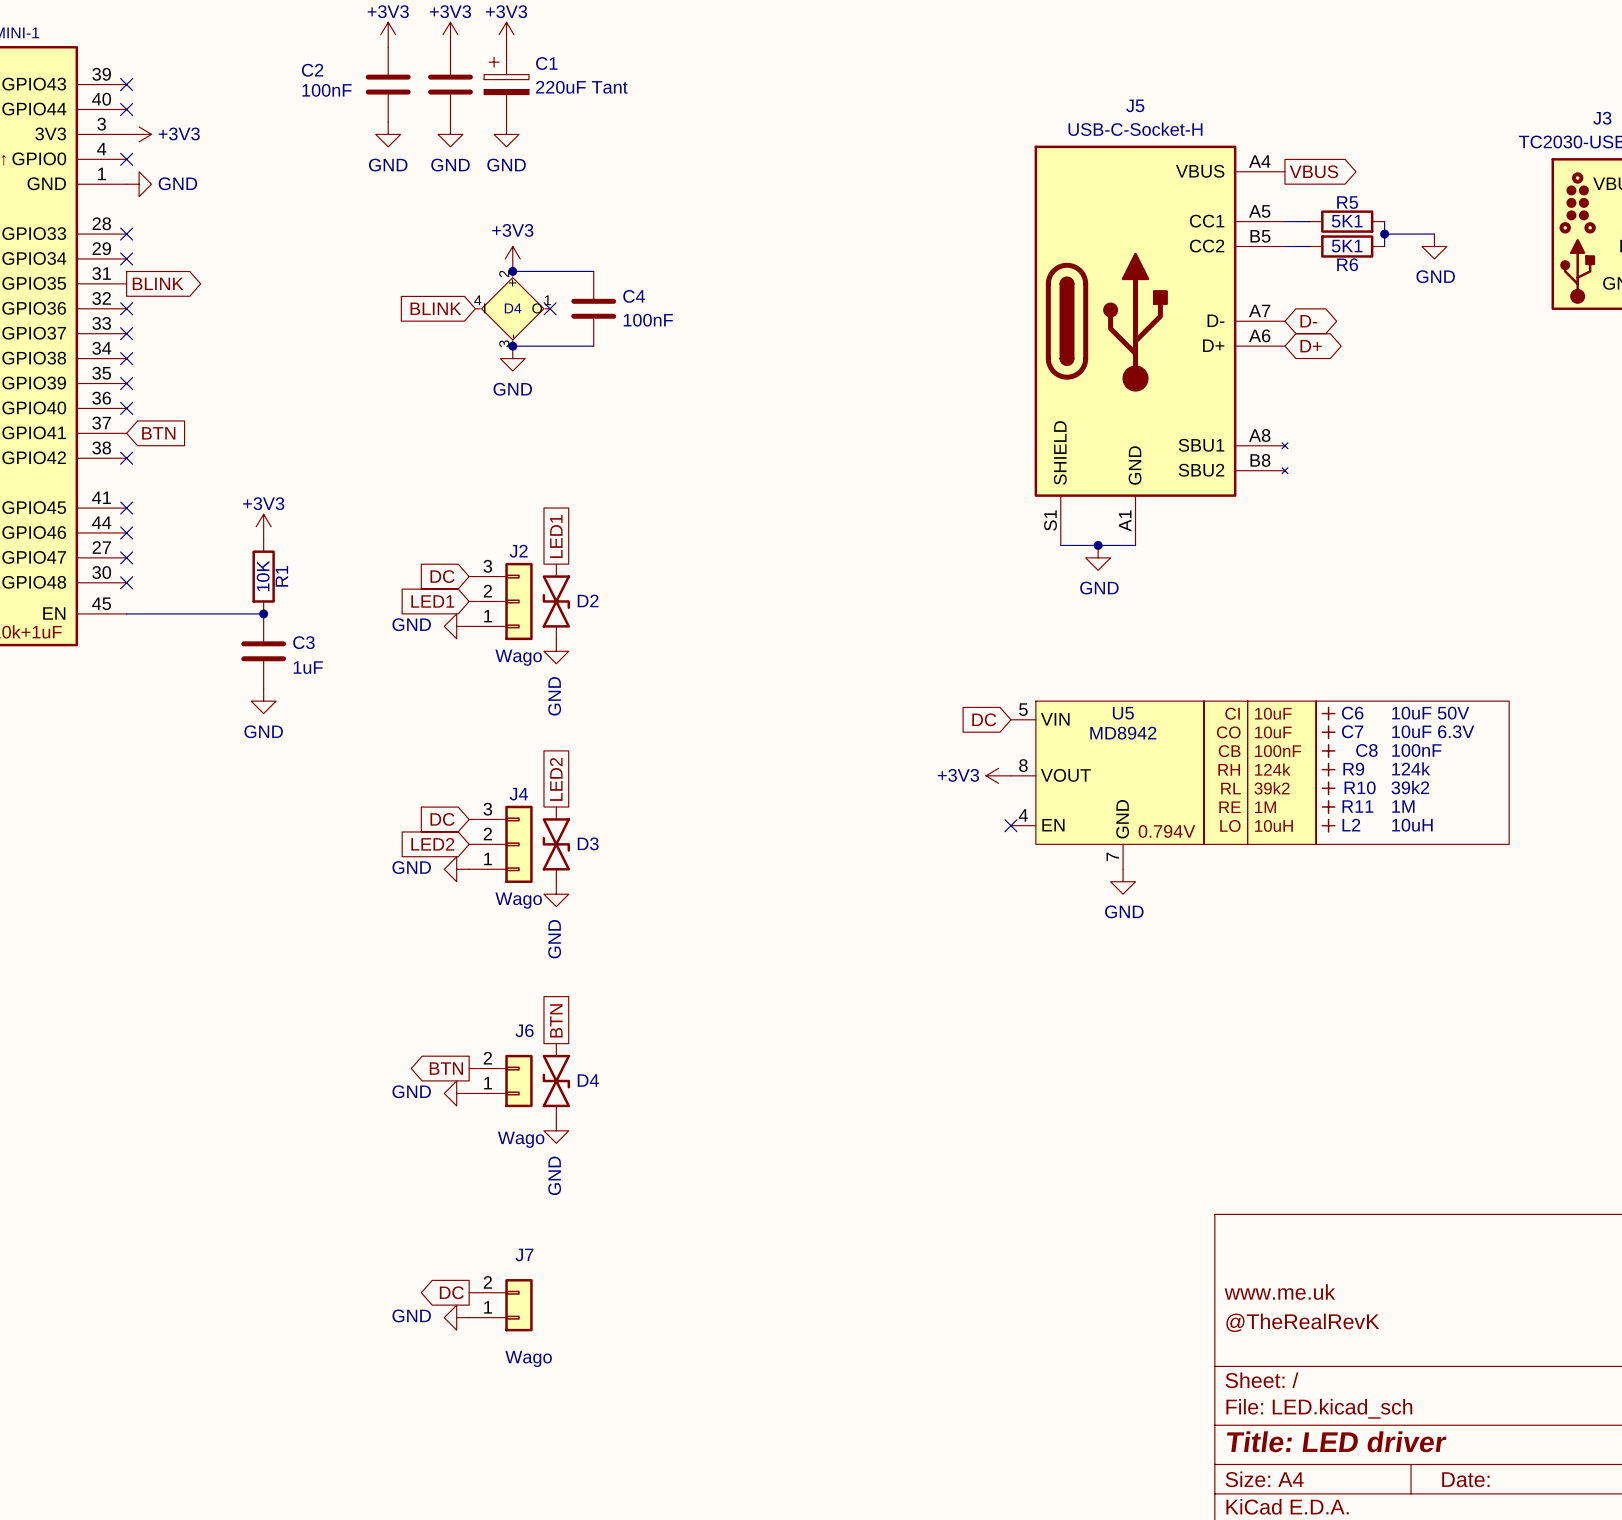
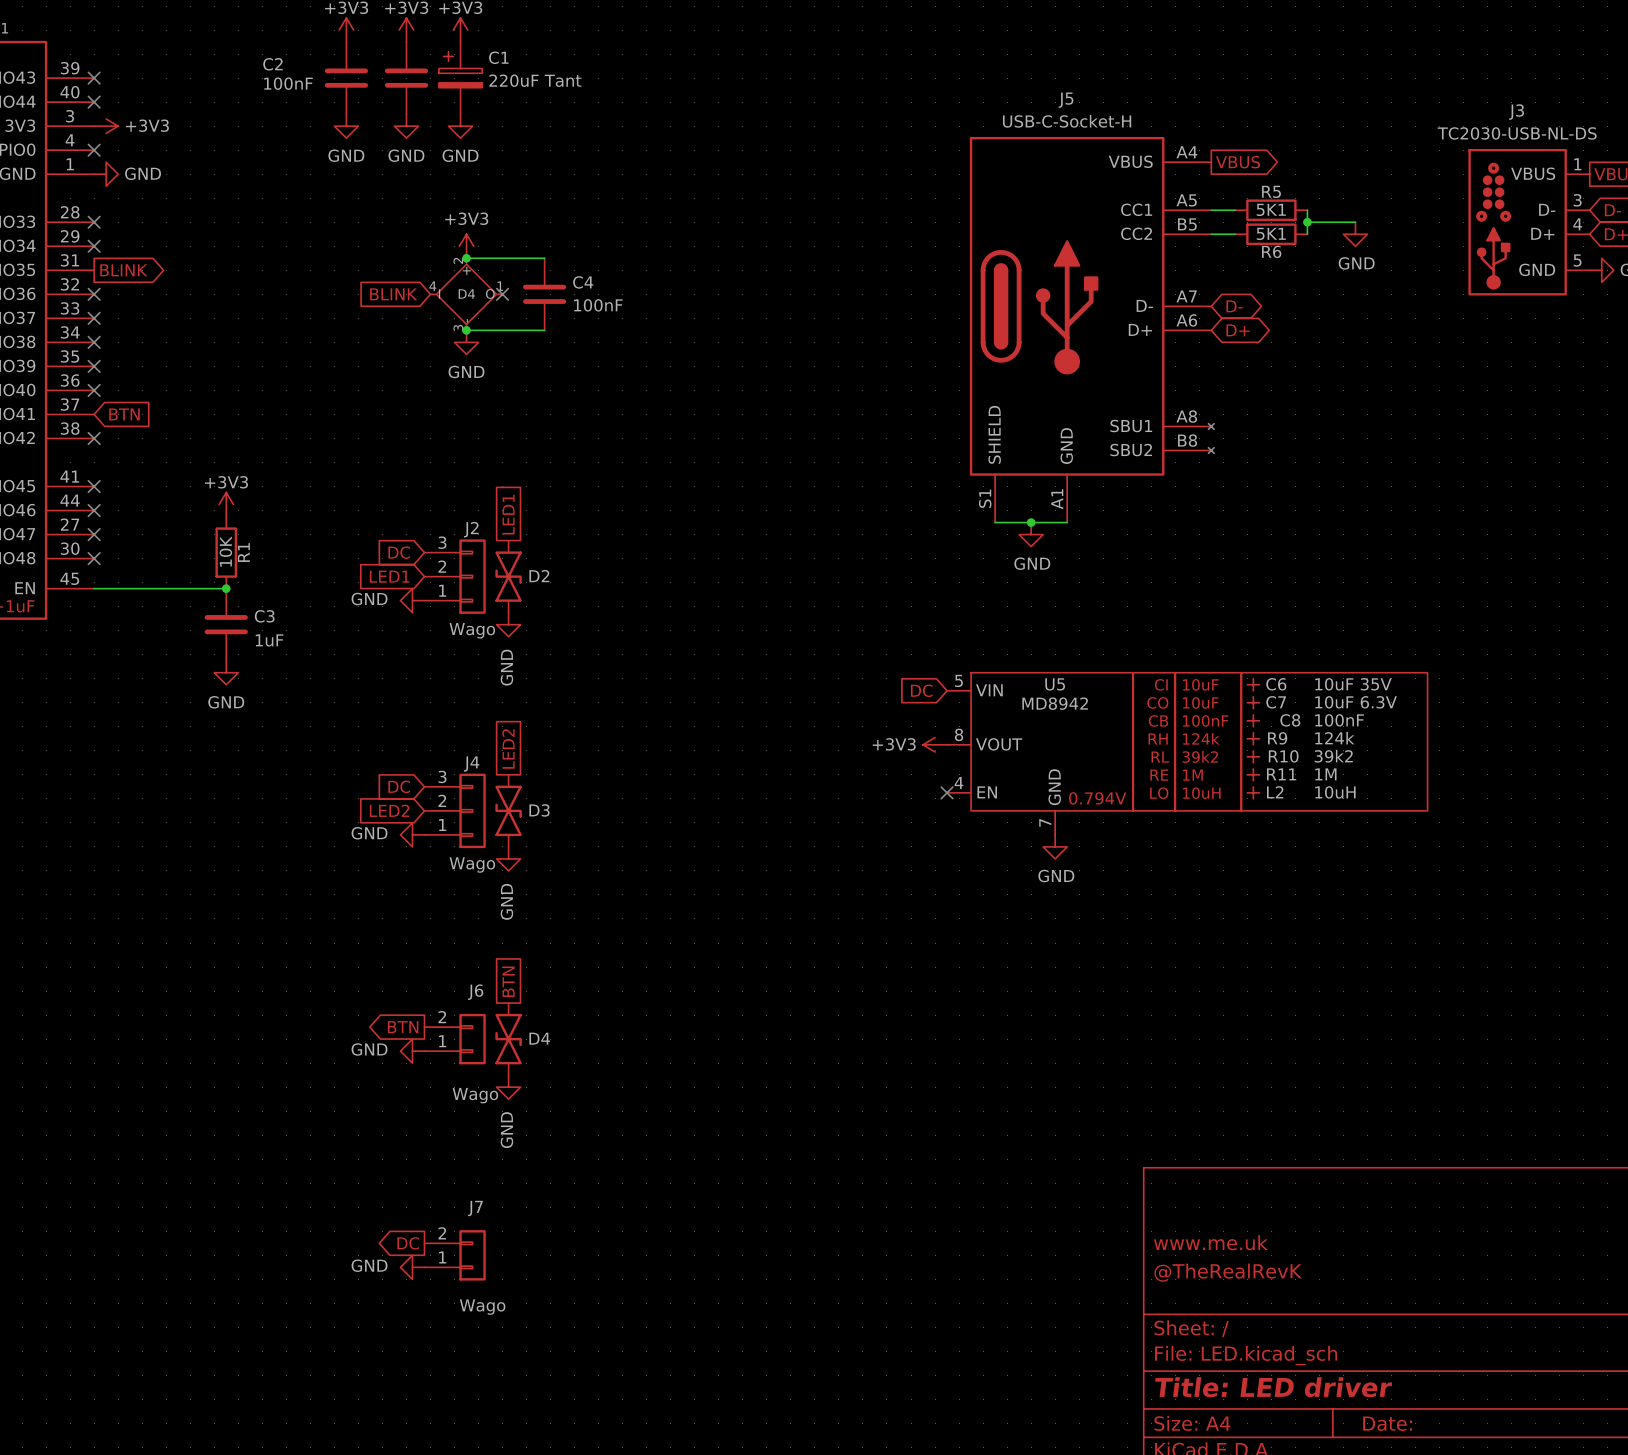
C6 value: 10uF 50V (1430, 713) -> 10uF 35V (1353, 684)

